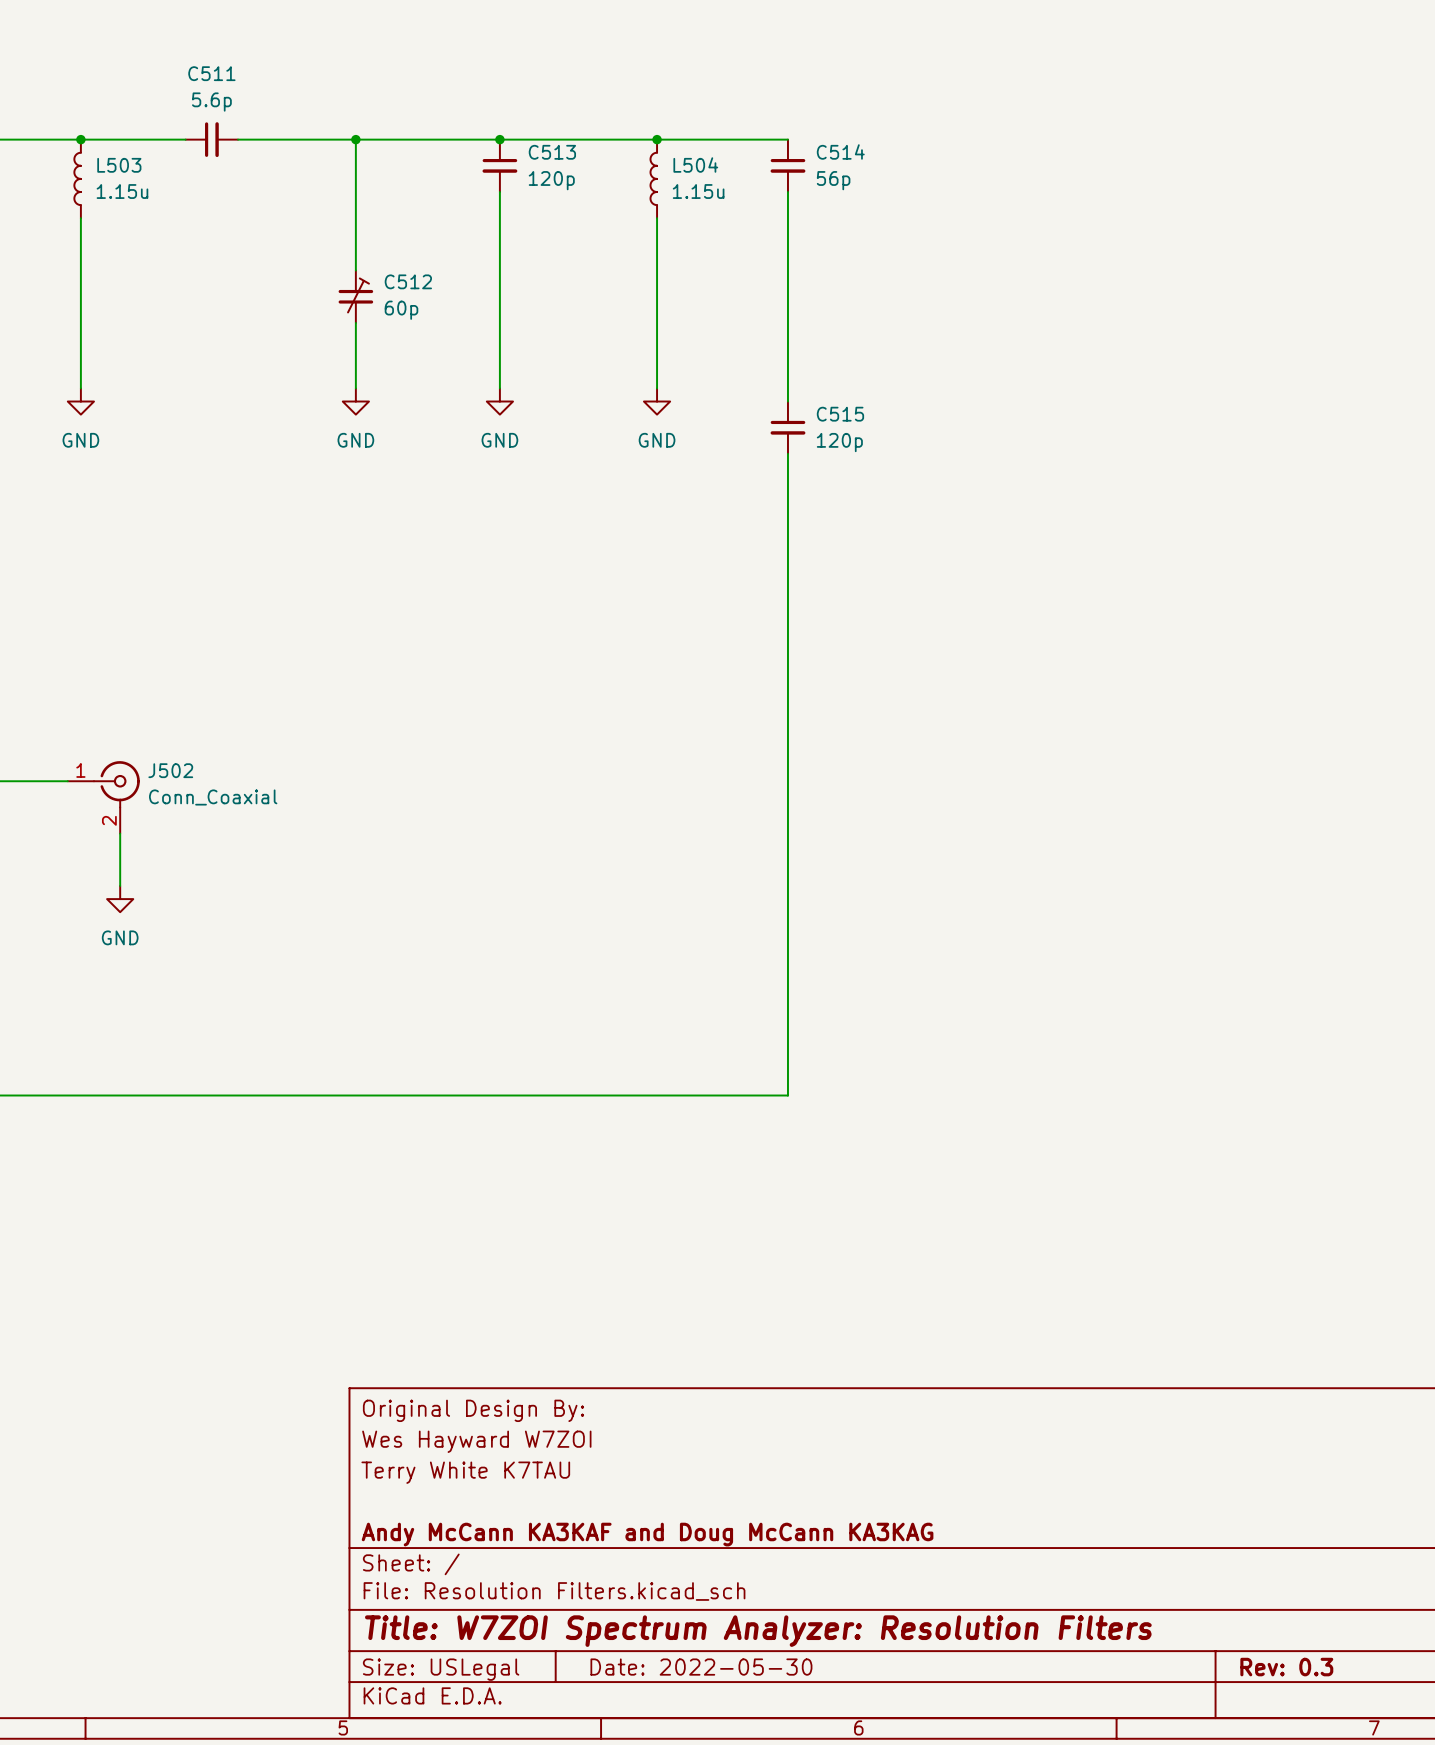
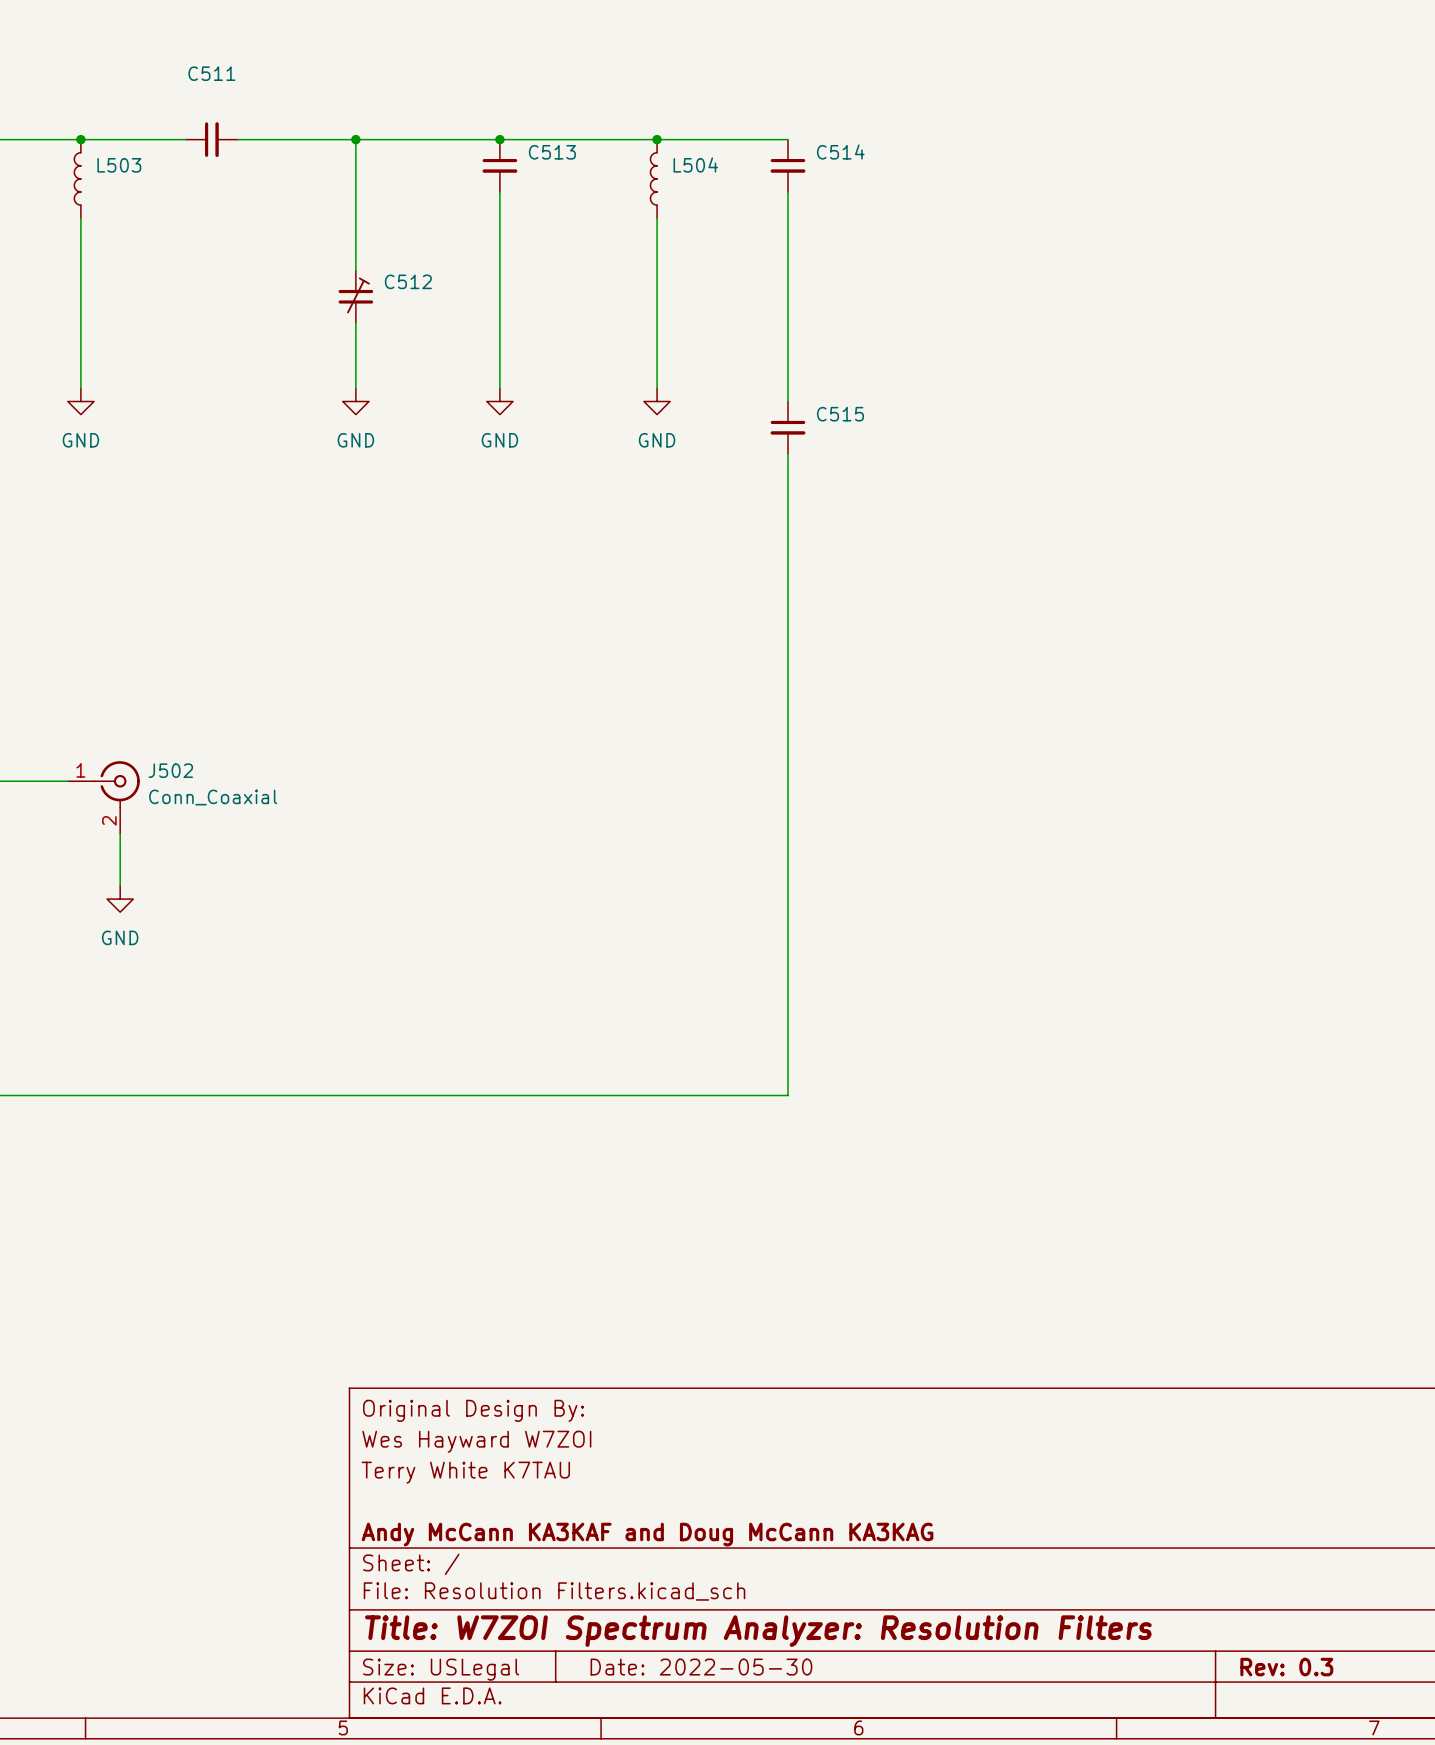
C511 value: 5.6p (211, 102) -> none
C513 value: 120p (551, 180) -> none
C514 value: 56p (833, 180) -> none
L503 value: 1.15u (122, 191) -> none
L504 value: 1.15u (698, 191) -> none
C512 value: 60p (401, 310) -> none
C515 value: 120p (839, 442) -> none

